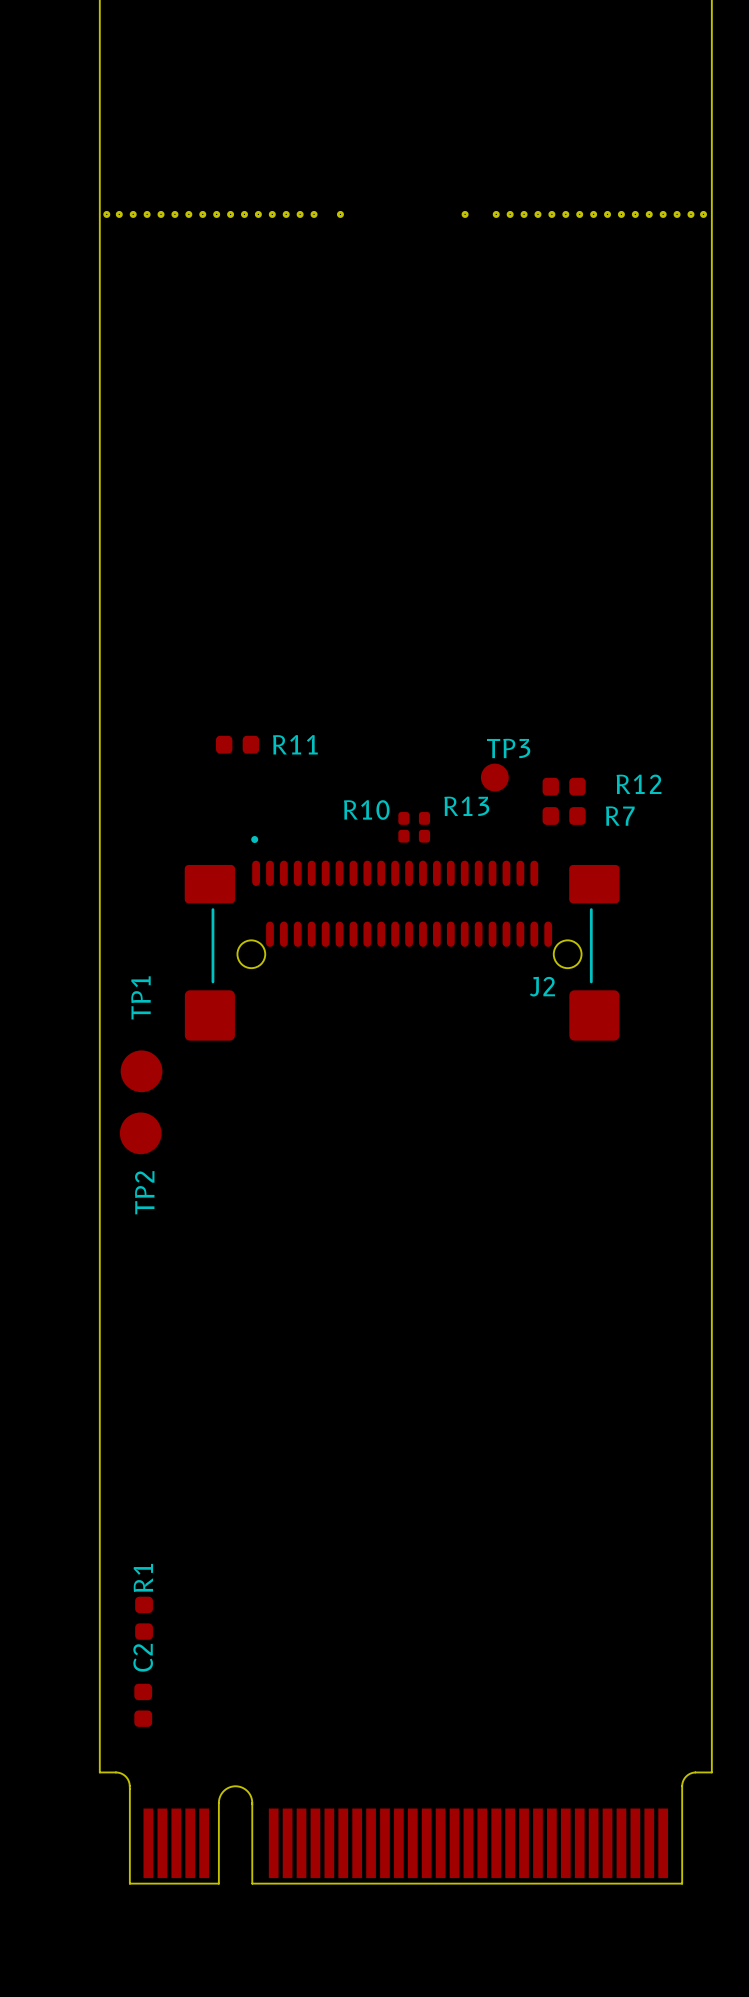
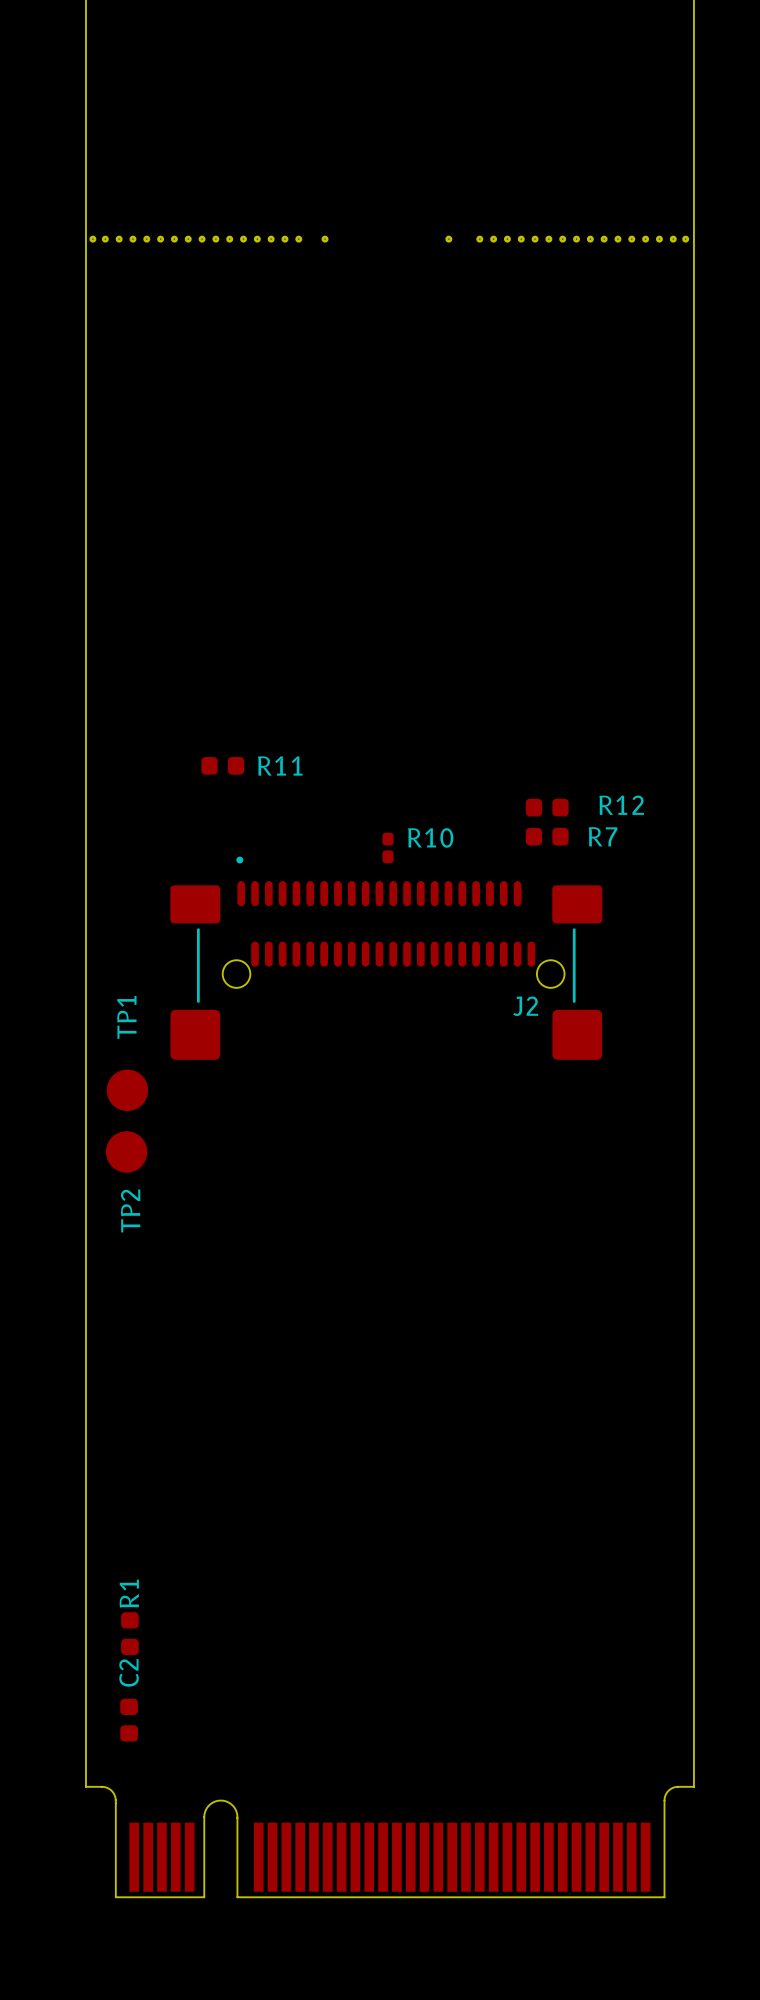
TP3: (494, 777) -> none
R10 name position: R10 (366, 809) -> R10 (430, 837)
R13: (424, 827) -> none

